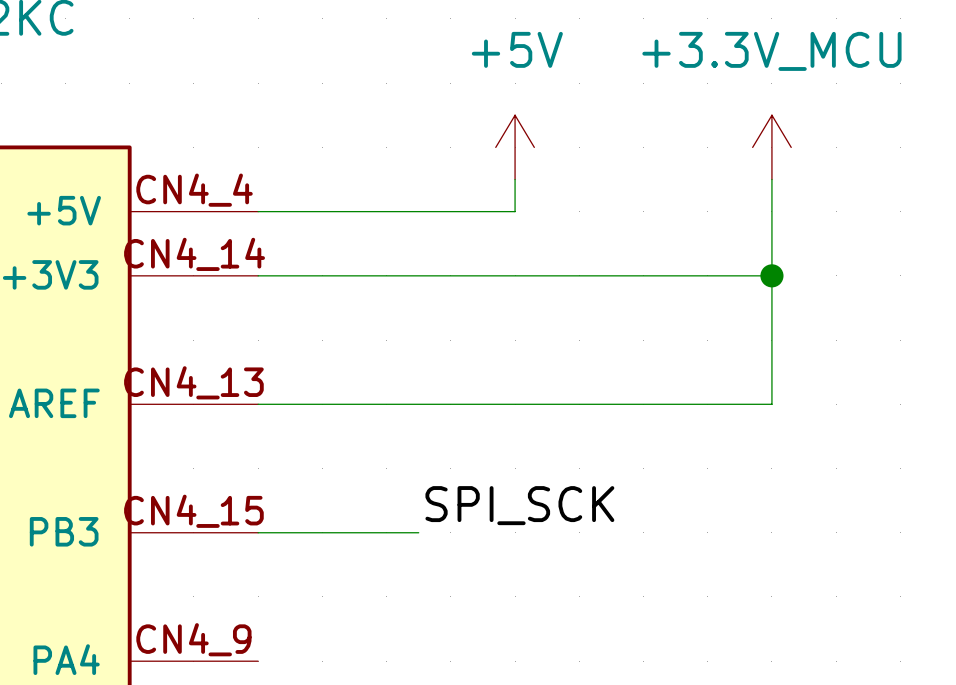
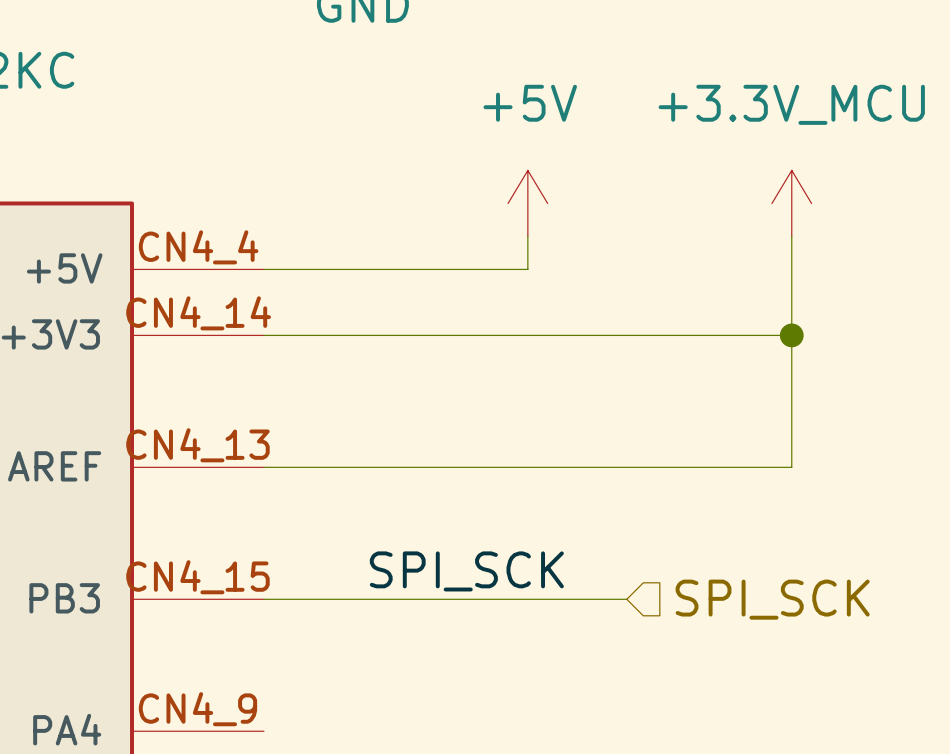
label position: SPI_SCK (519, 505) -> SPI_SCK (466, 571)
wire: none -> (428, 599) (626, 599)
hierarchical label: none -> SPI_SCK (772, 599)

